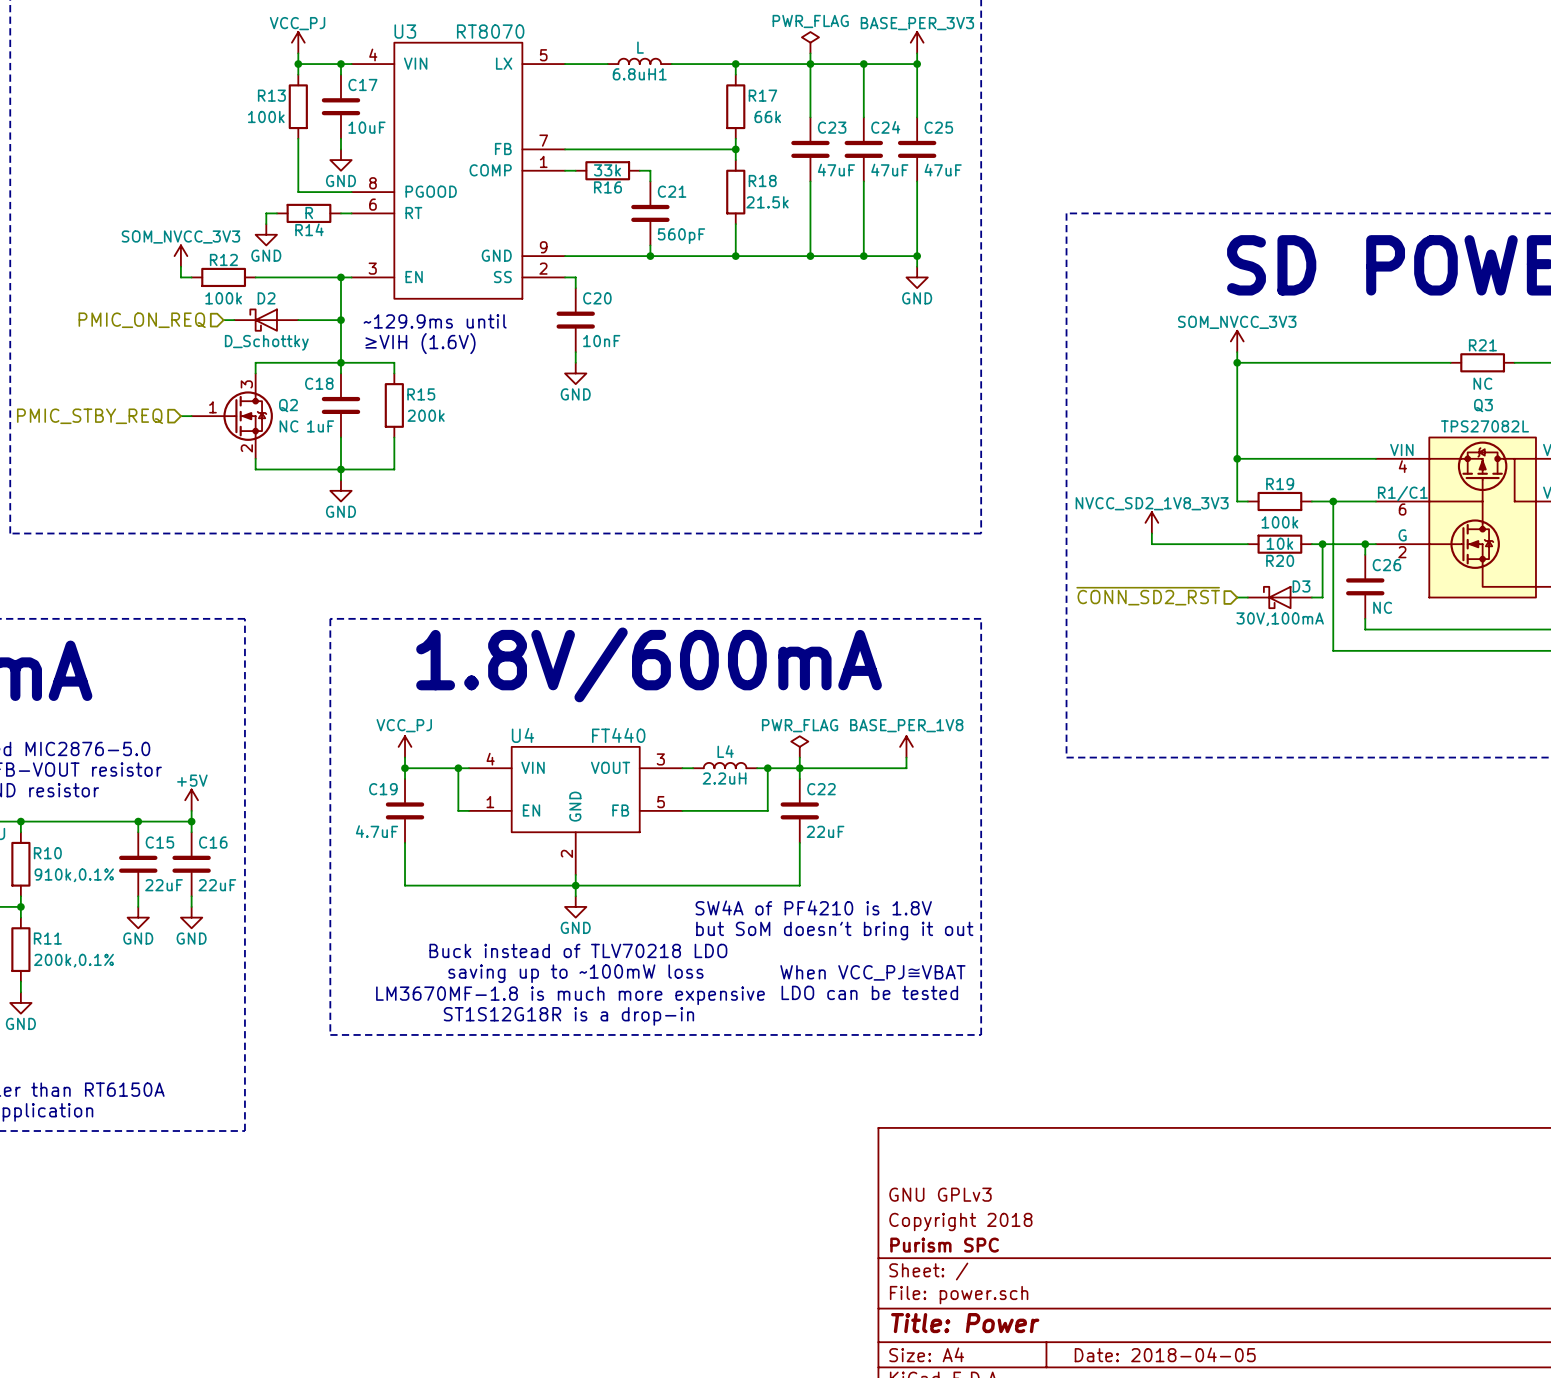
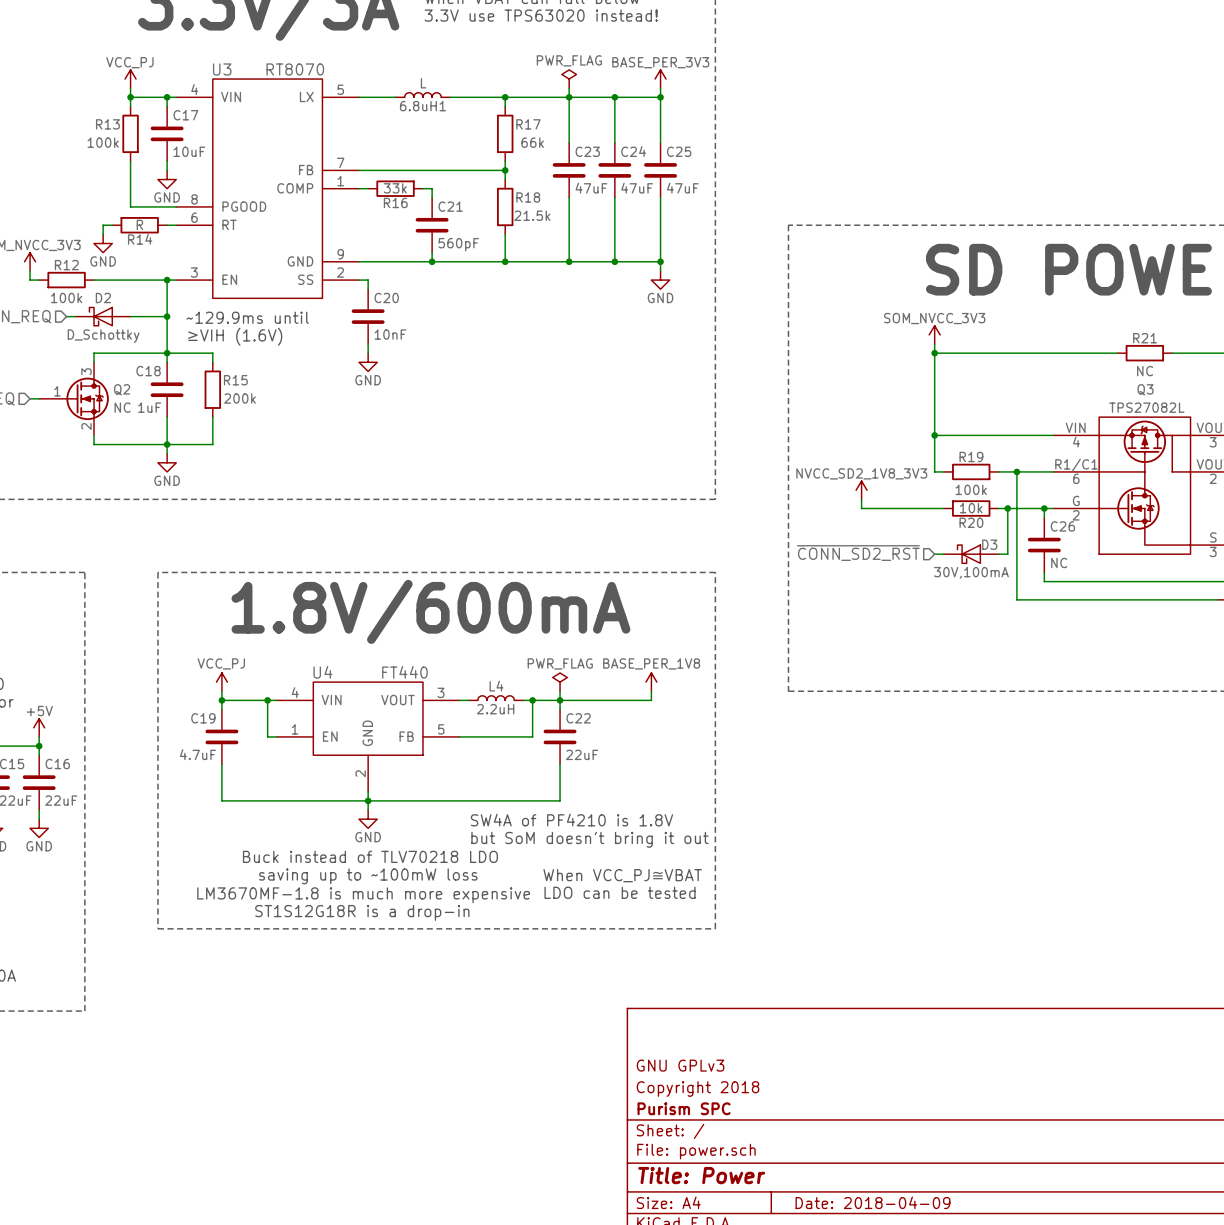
title block: Date: 2018-04-05 (1165, 1354) -> Date: 2018-04-09 (873, 1202)

